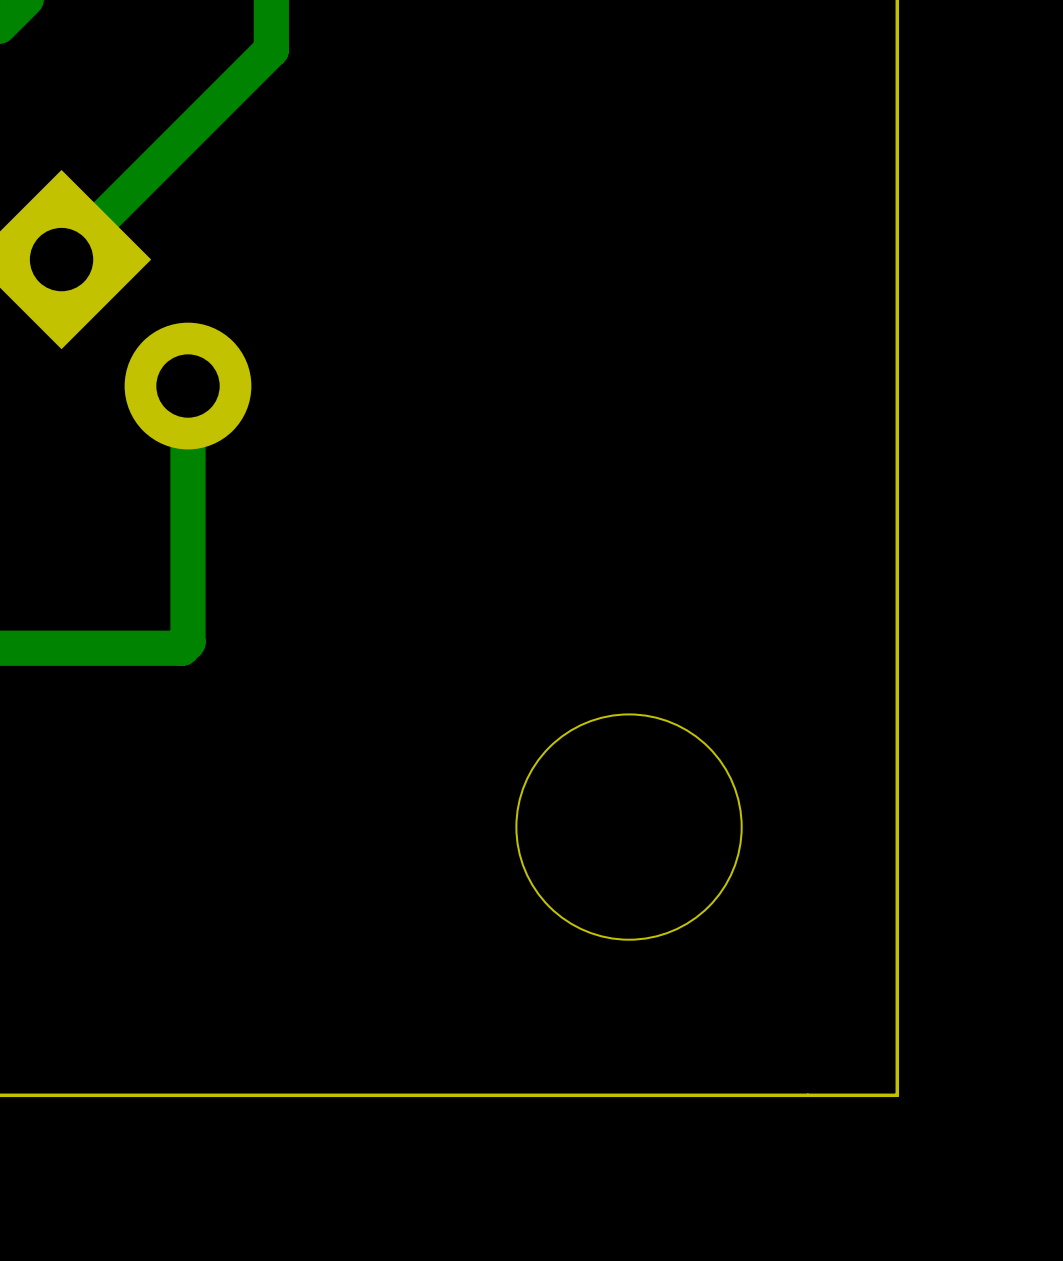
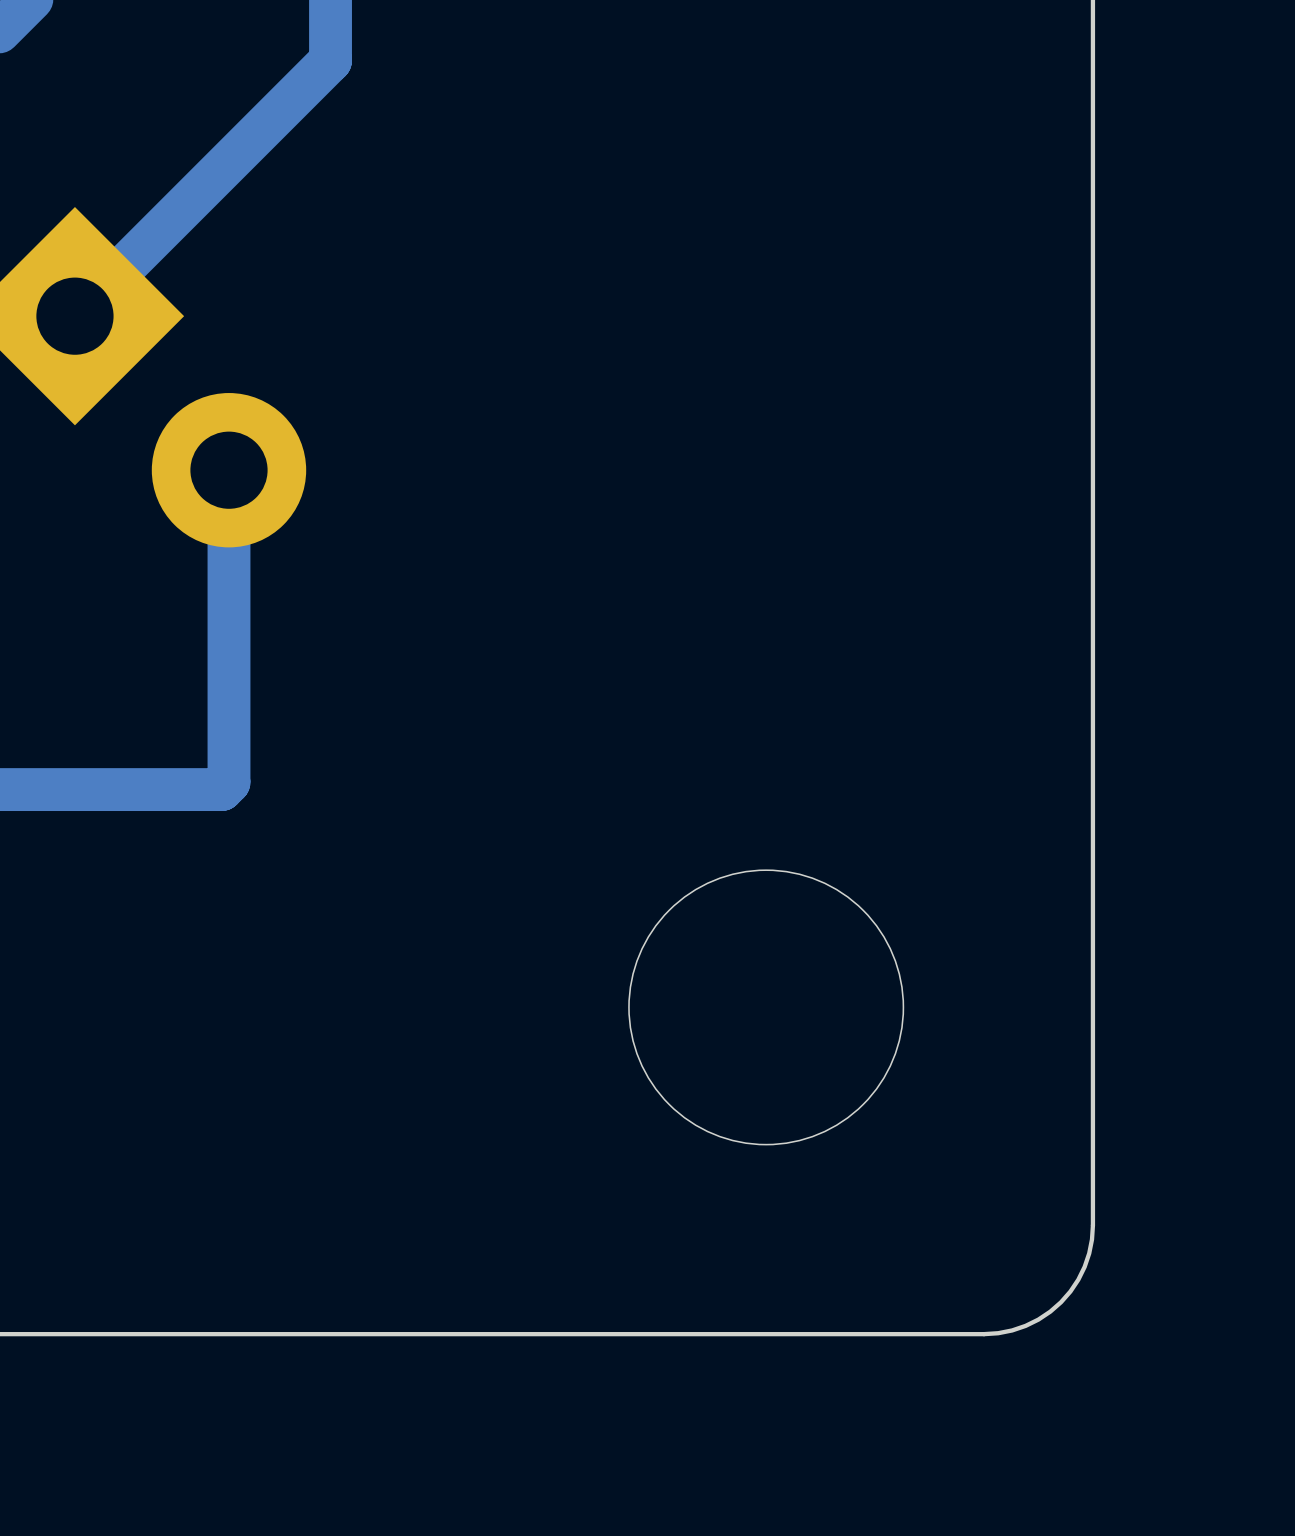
board edge: (897, 1005) (897, 1095) (807, 1095) -> (1092, 1225) (1089, 1253) (1084, 1266) (1078, 1279) (1061, 1302) (1038, 1319) (1025, 1325) (1012, 1330) (984, 1334)

